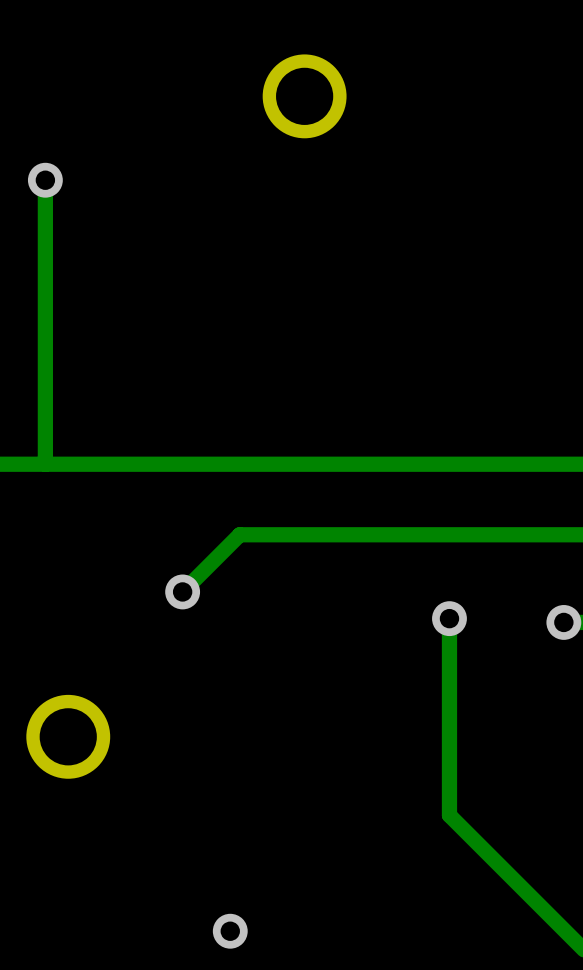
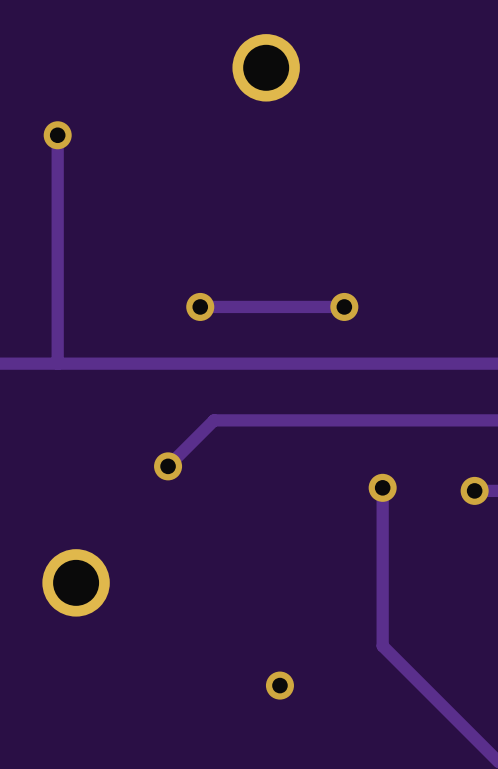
via: none -> (200, 306)
track: none -> (344, 306) (200, 306)
via: none -> (344, 306)
via position: (230, 931) -> (279, 685)

